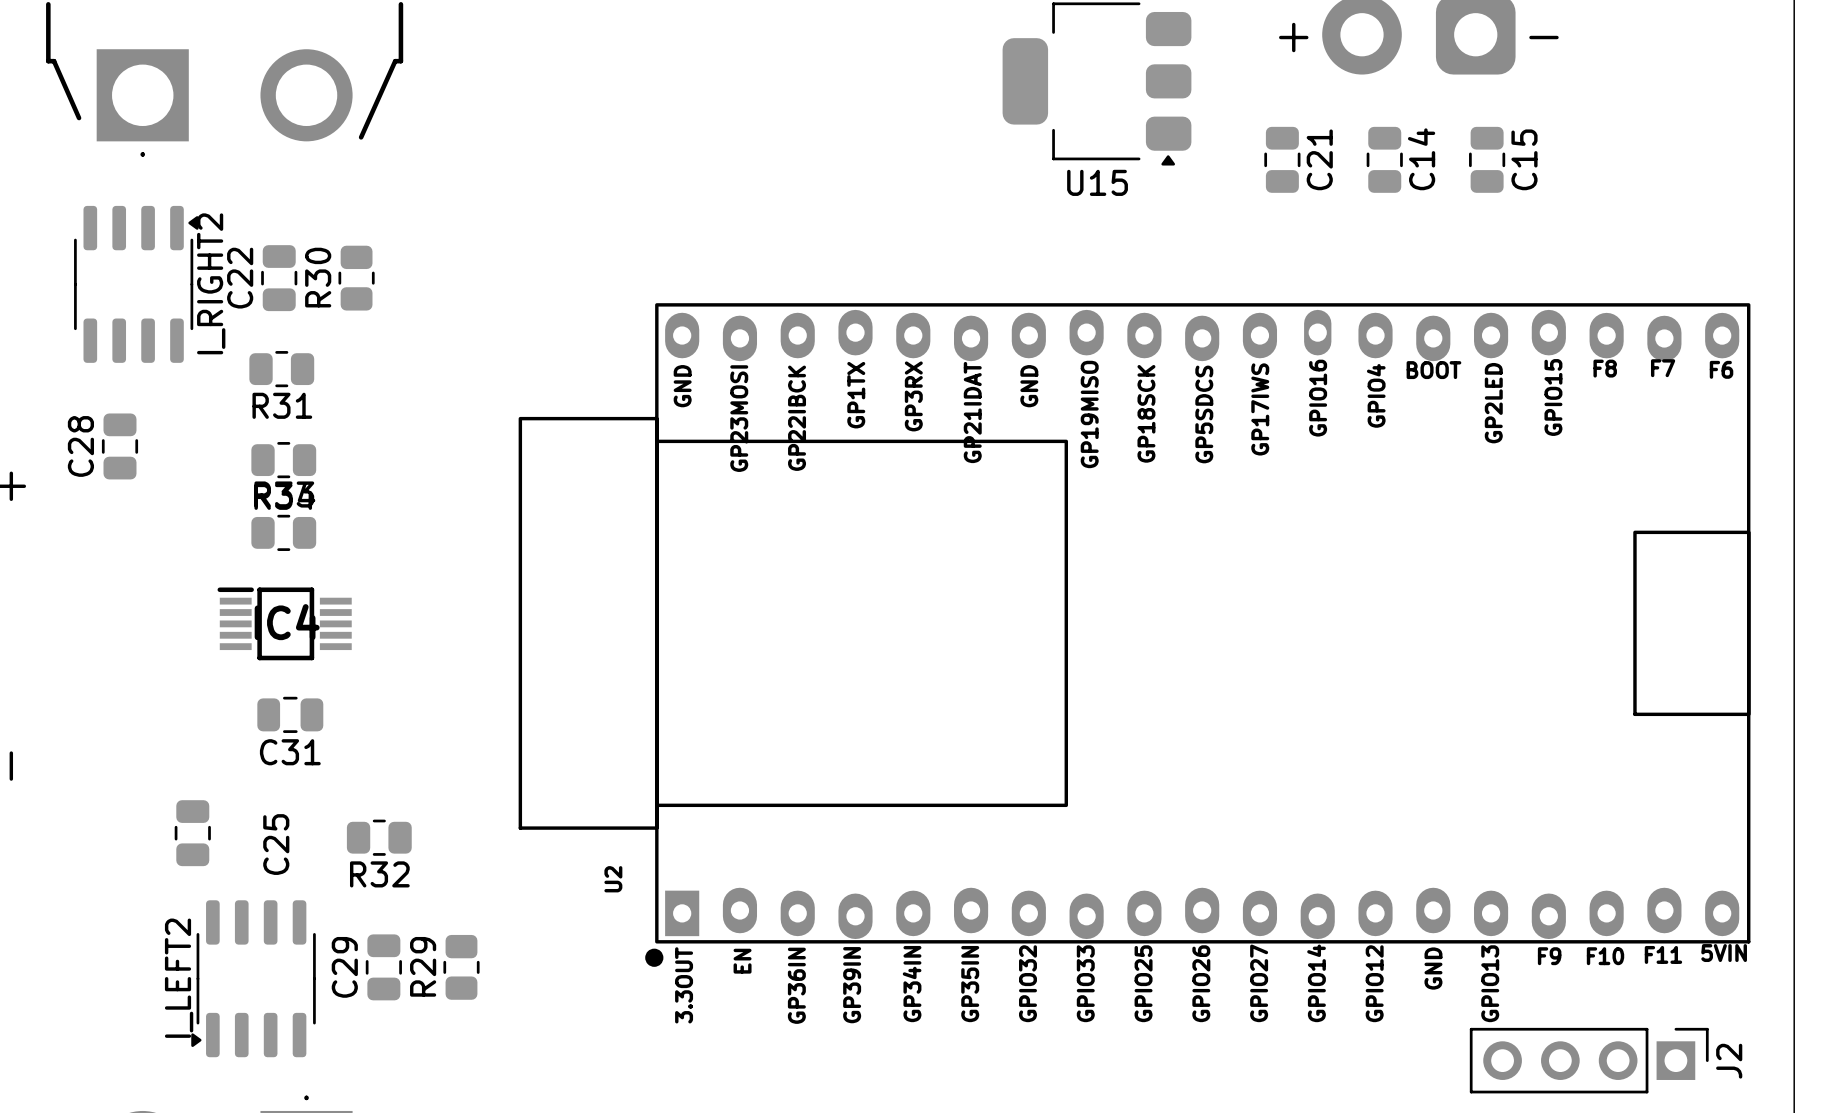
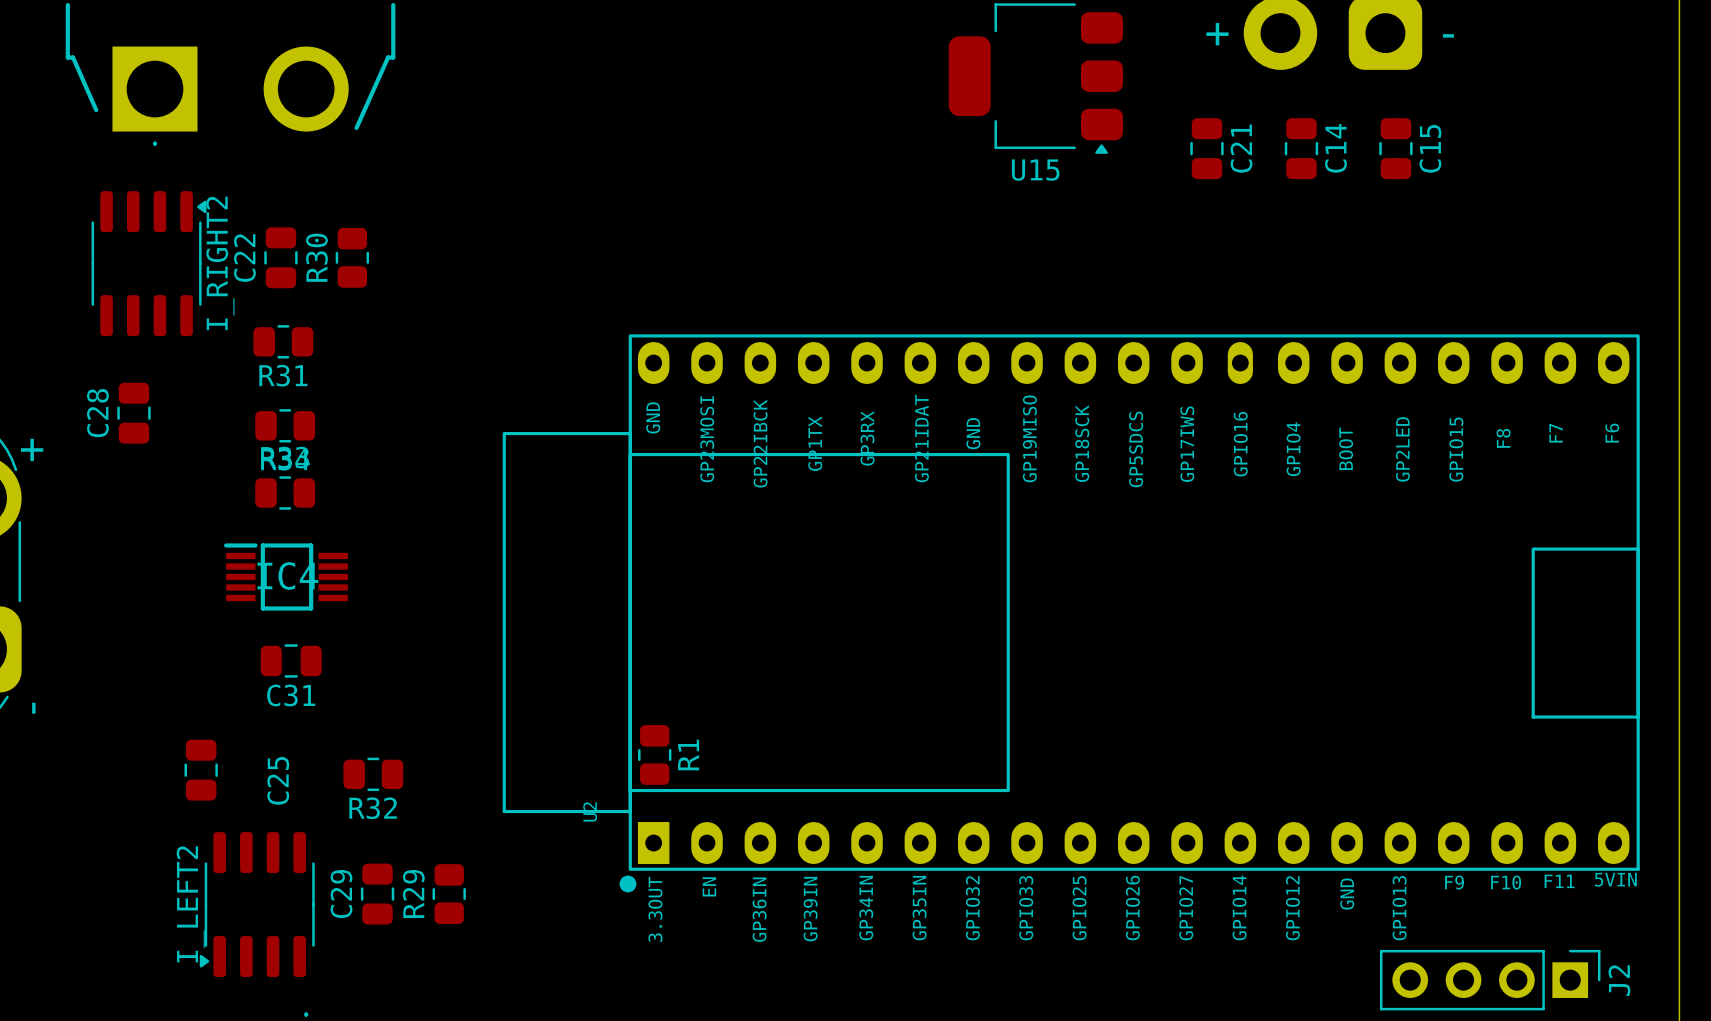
U2 footprint: [518, 303, 1751, 967] -> [502, 334, 1640, 893]
R1: none -> (654, 754)

